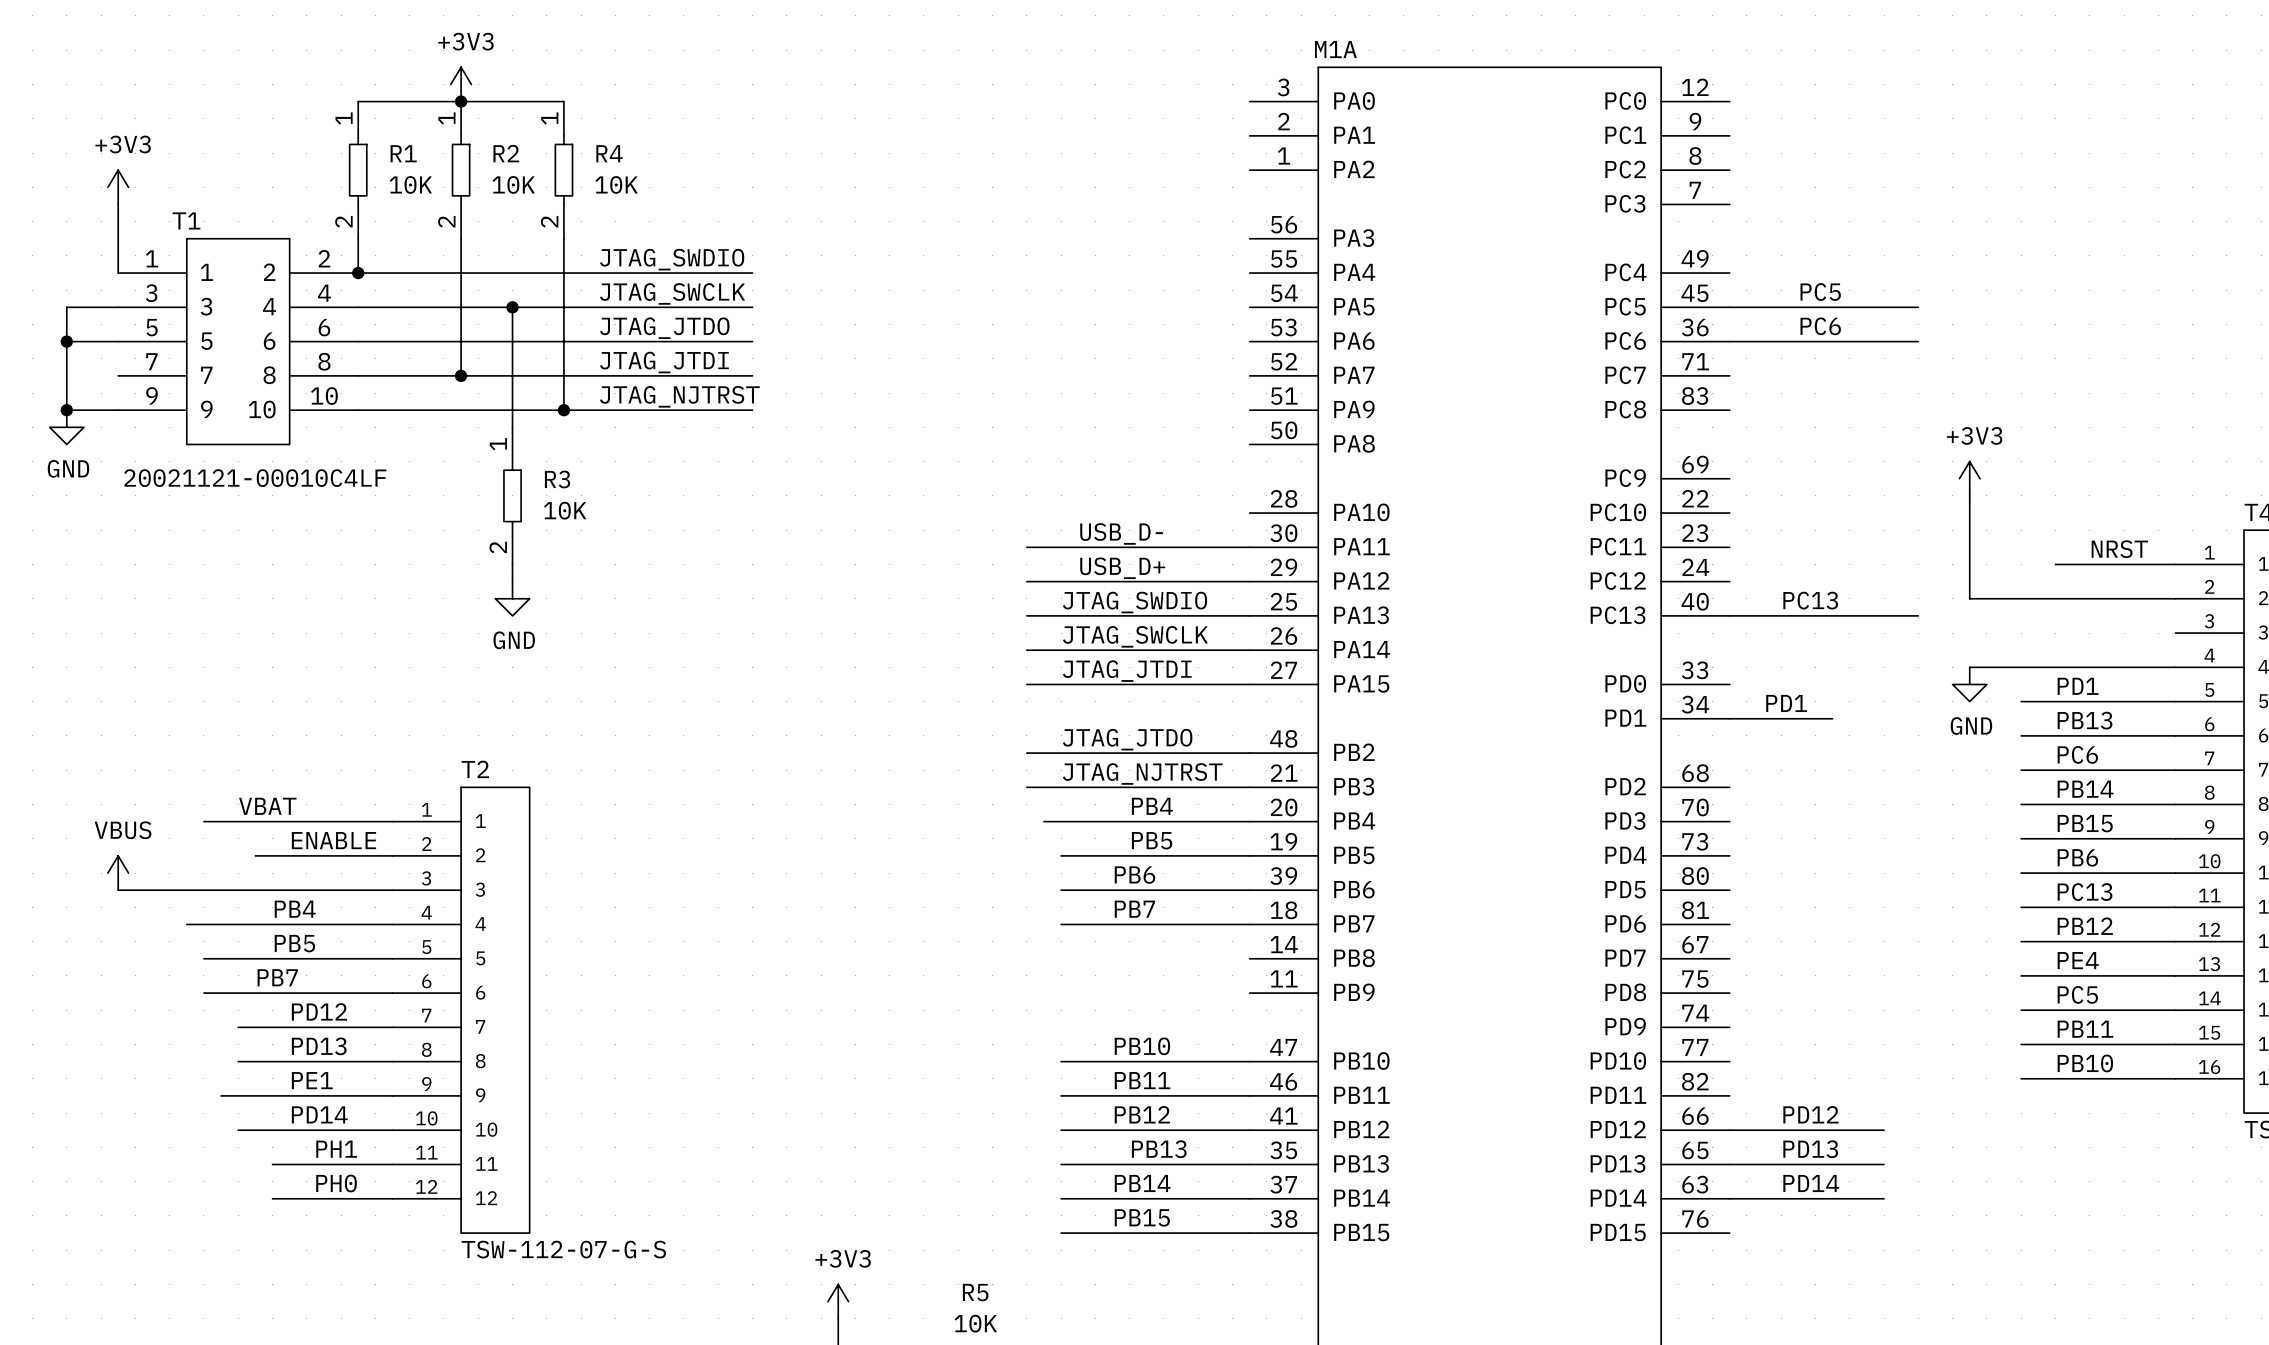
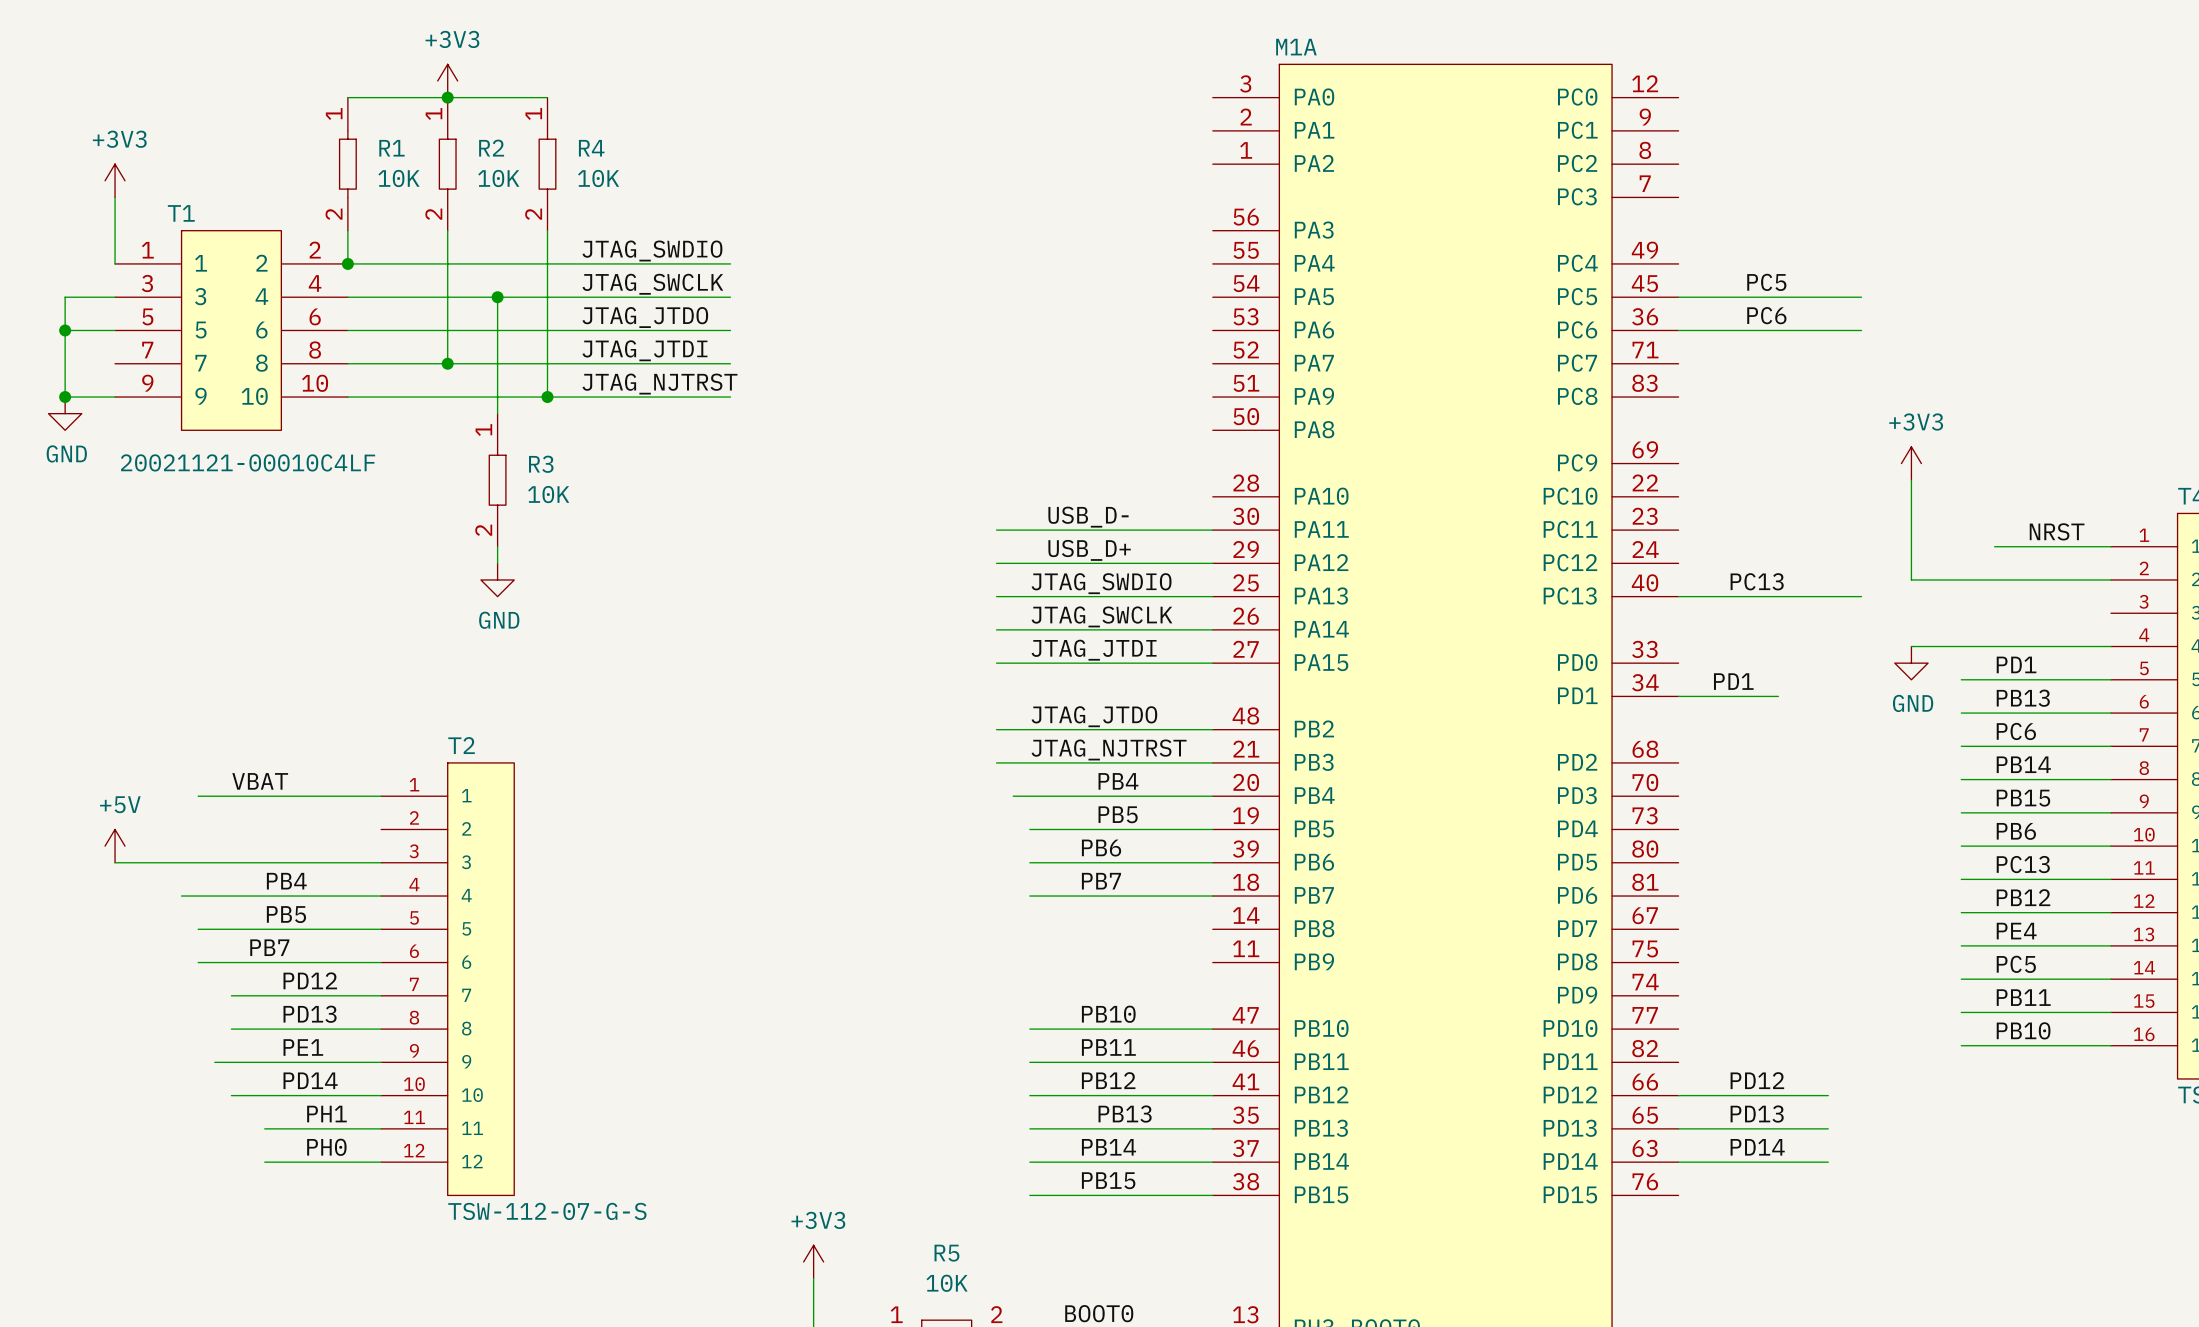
label: ENABLE (333, 840) -> none
wire: (255, 855) (392, 855) -> none
power symbol: VBUS (118, 873) -> +5V (115, 846)

